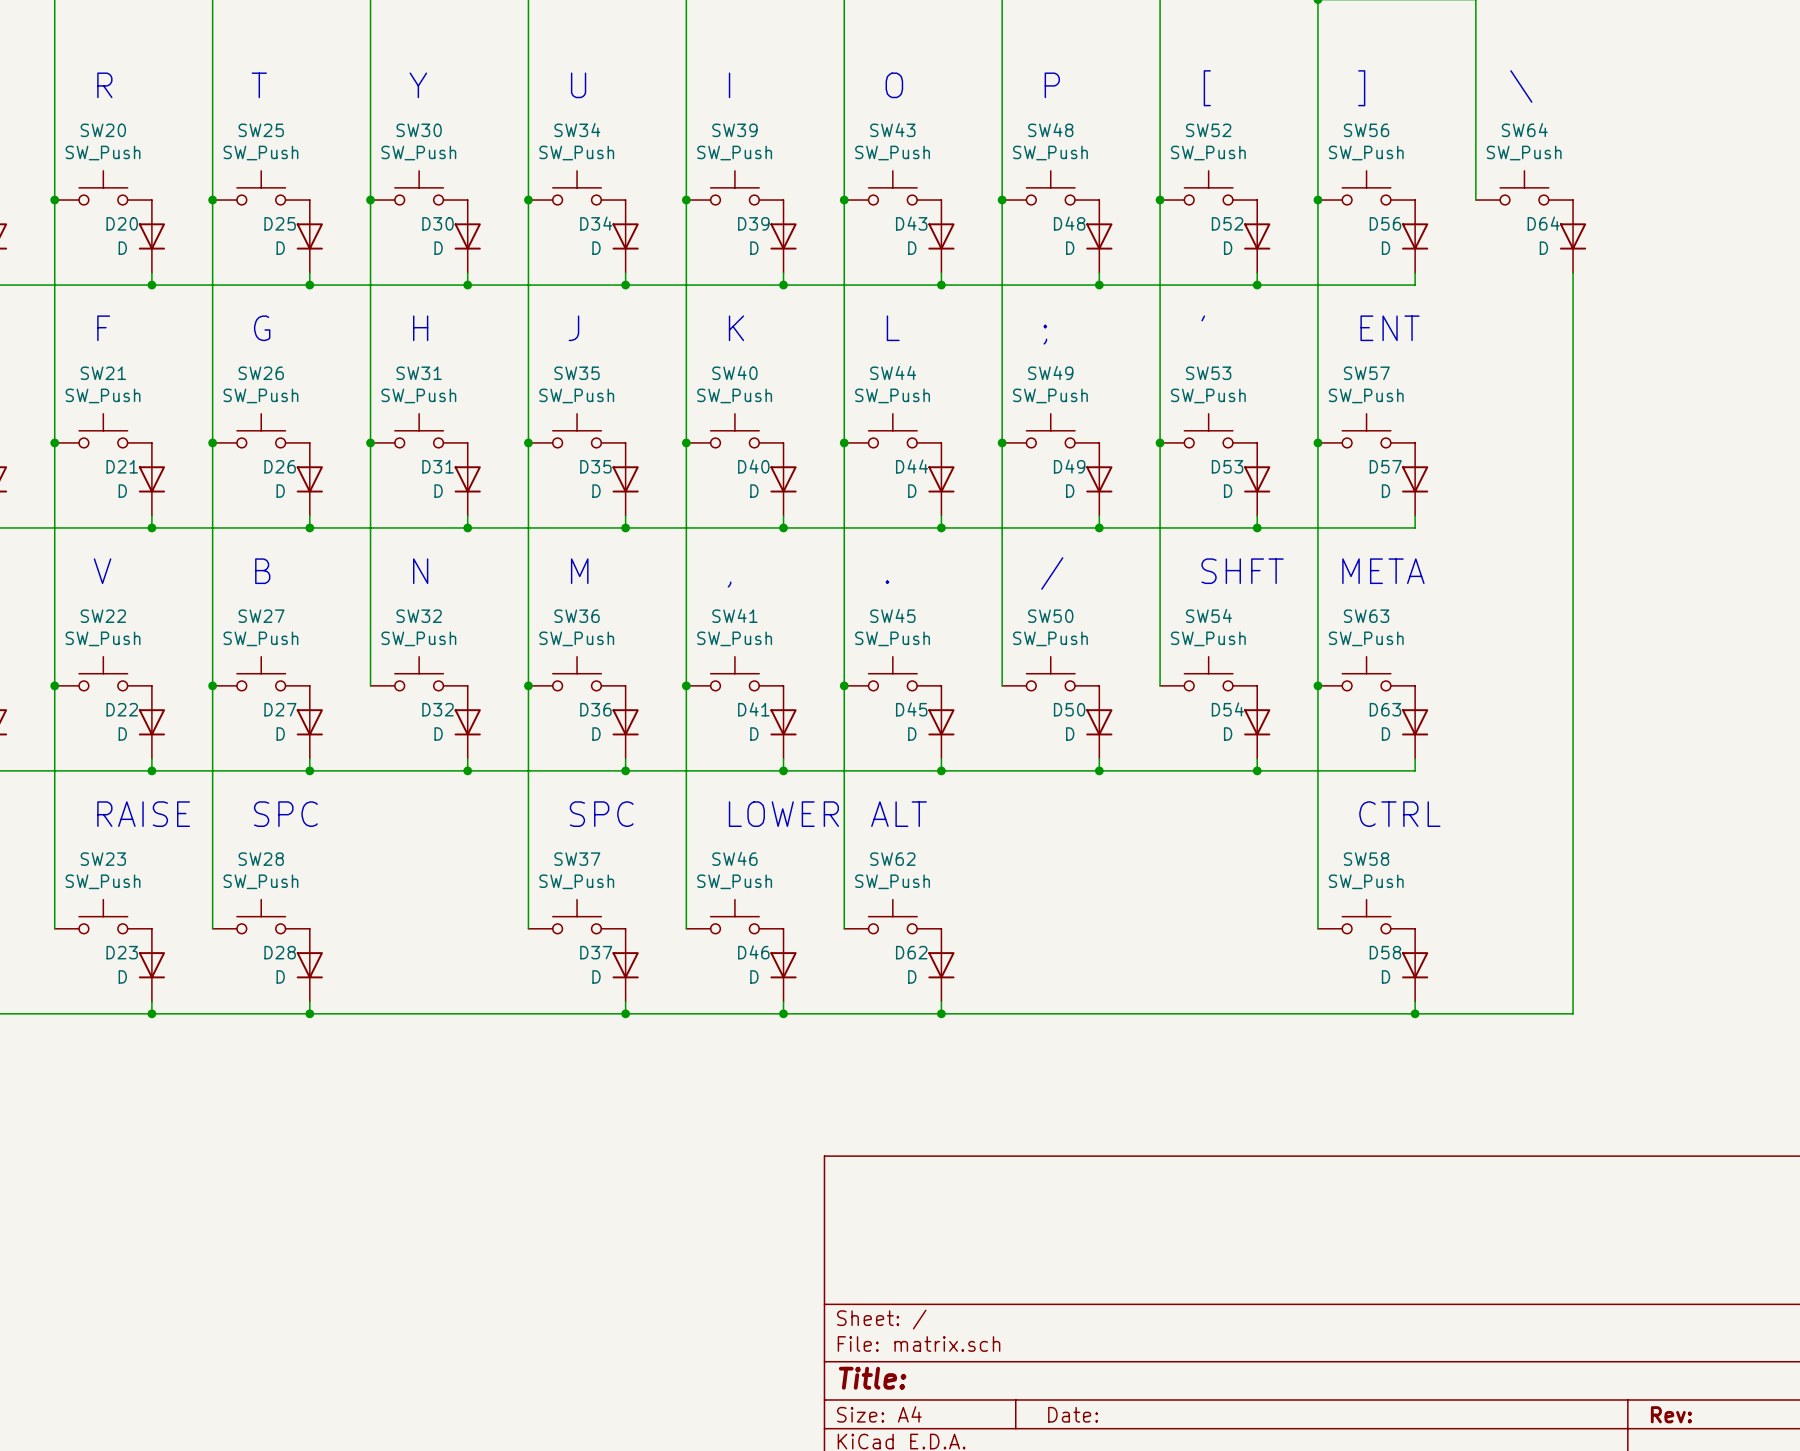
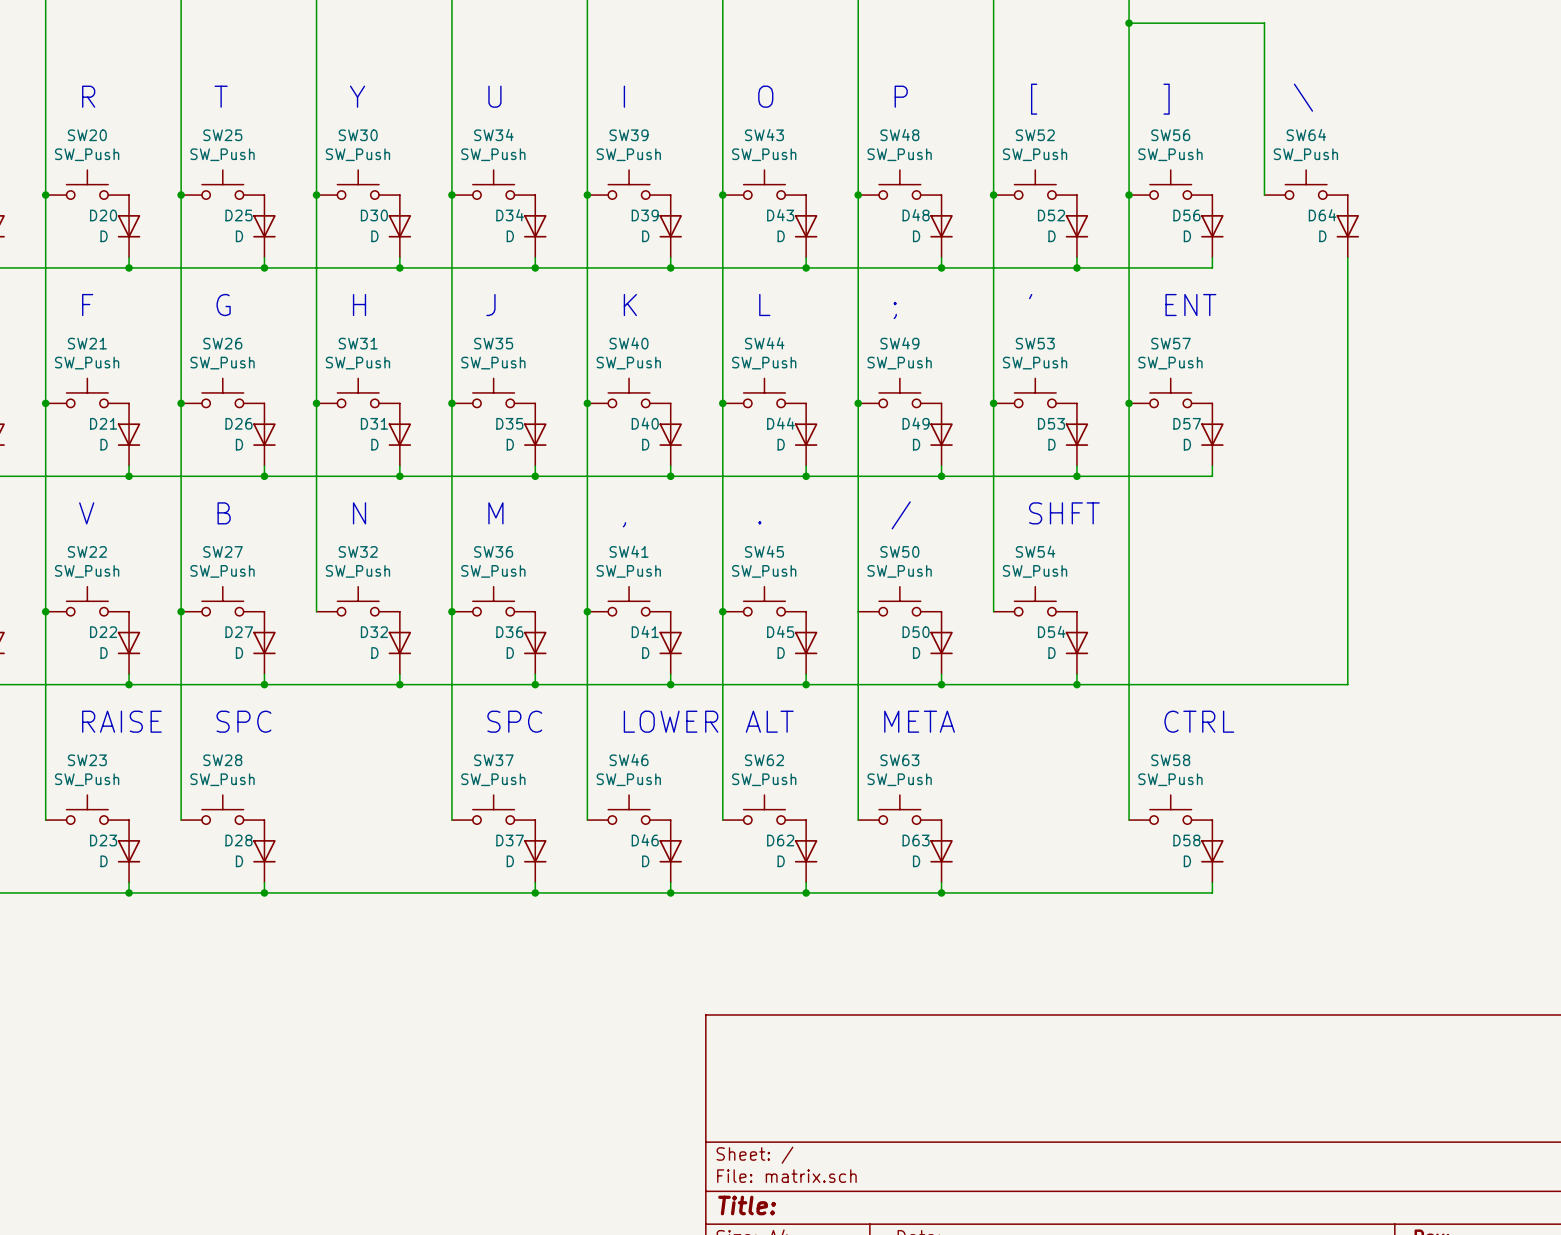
text: META (1383, 571) -> none
SW63 position: (1366, 673) -> (899, 809)
wire: none -> (858, 611) (858, 820)
junction: (1317, 685) -> none
D63 position: (1415, 722) -> (941, 851)
wire: (1415, 758) (1415, 770) -> (1347, 684) (1212, 684)
wire: (1573, 770) (1573, 1013) (1415, 1013) -> none
text: none -> META (919, 721)
wire: none -> (941, 882) (941, 892)
junction: none -> (941, 892)
junction: (1415, 1013) -> none

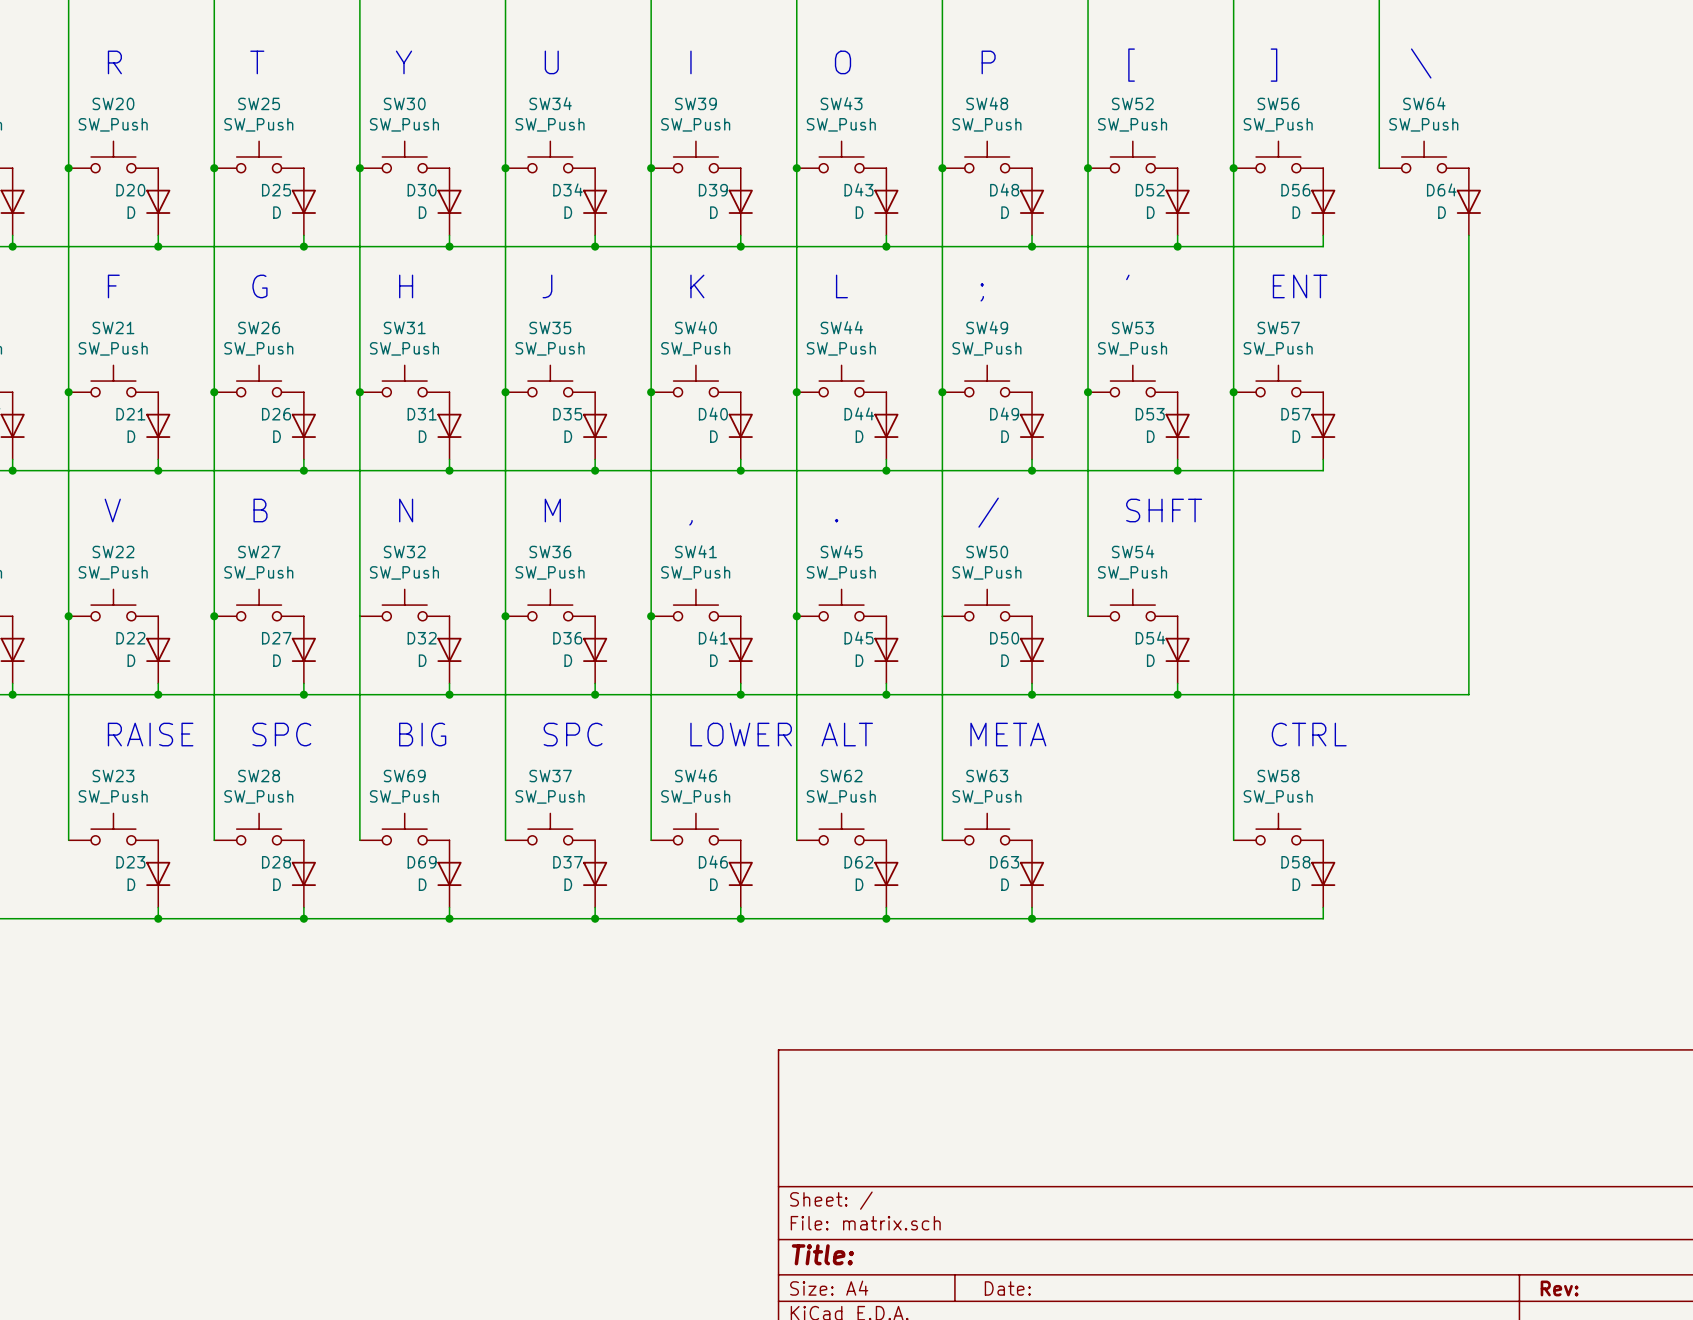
wire: none -> (359, 616) (359, 840)
text: none -> BIG (422, 734)
SW69: none -> SW_Push (404, 829)
D69: none -> D (449, 873)
wire: none -> (449, 907) (449, 918)
junction: none -> (449, 918)

